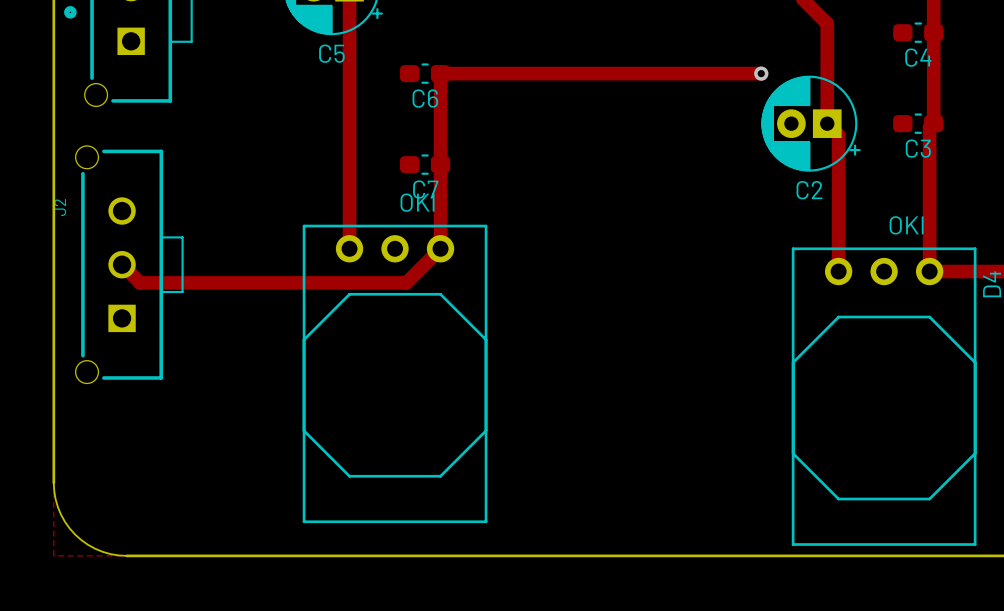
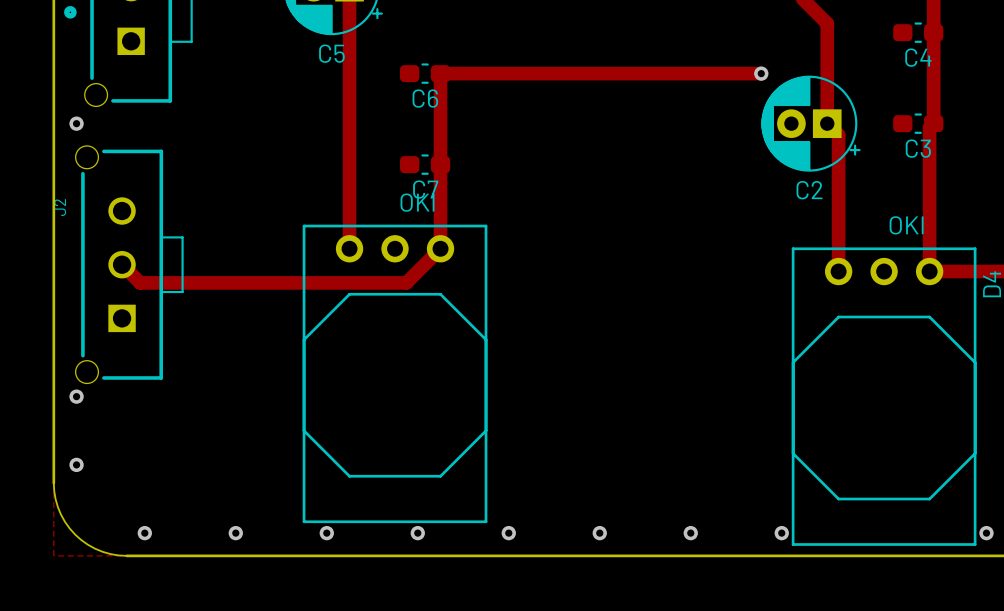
via: none -> (76, 123)
via: none -> (76, 396)
via: none -> (76, 464)
via: none -> (144, 533)
via: none -> (235, 533)
via: none -> (326, 533)
via: none -> (417, 533)
via: none -> (508, 533)
via: none -> (599, 533)
via: none -> (690, 533)
via: none -> (781, 533)
via: none -> (986, 533)

